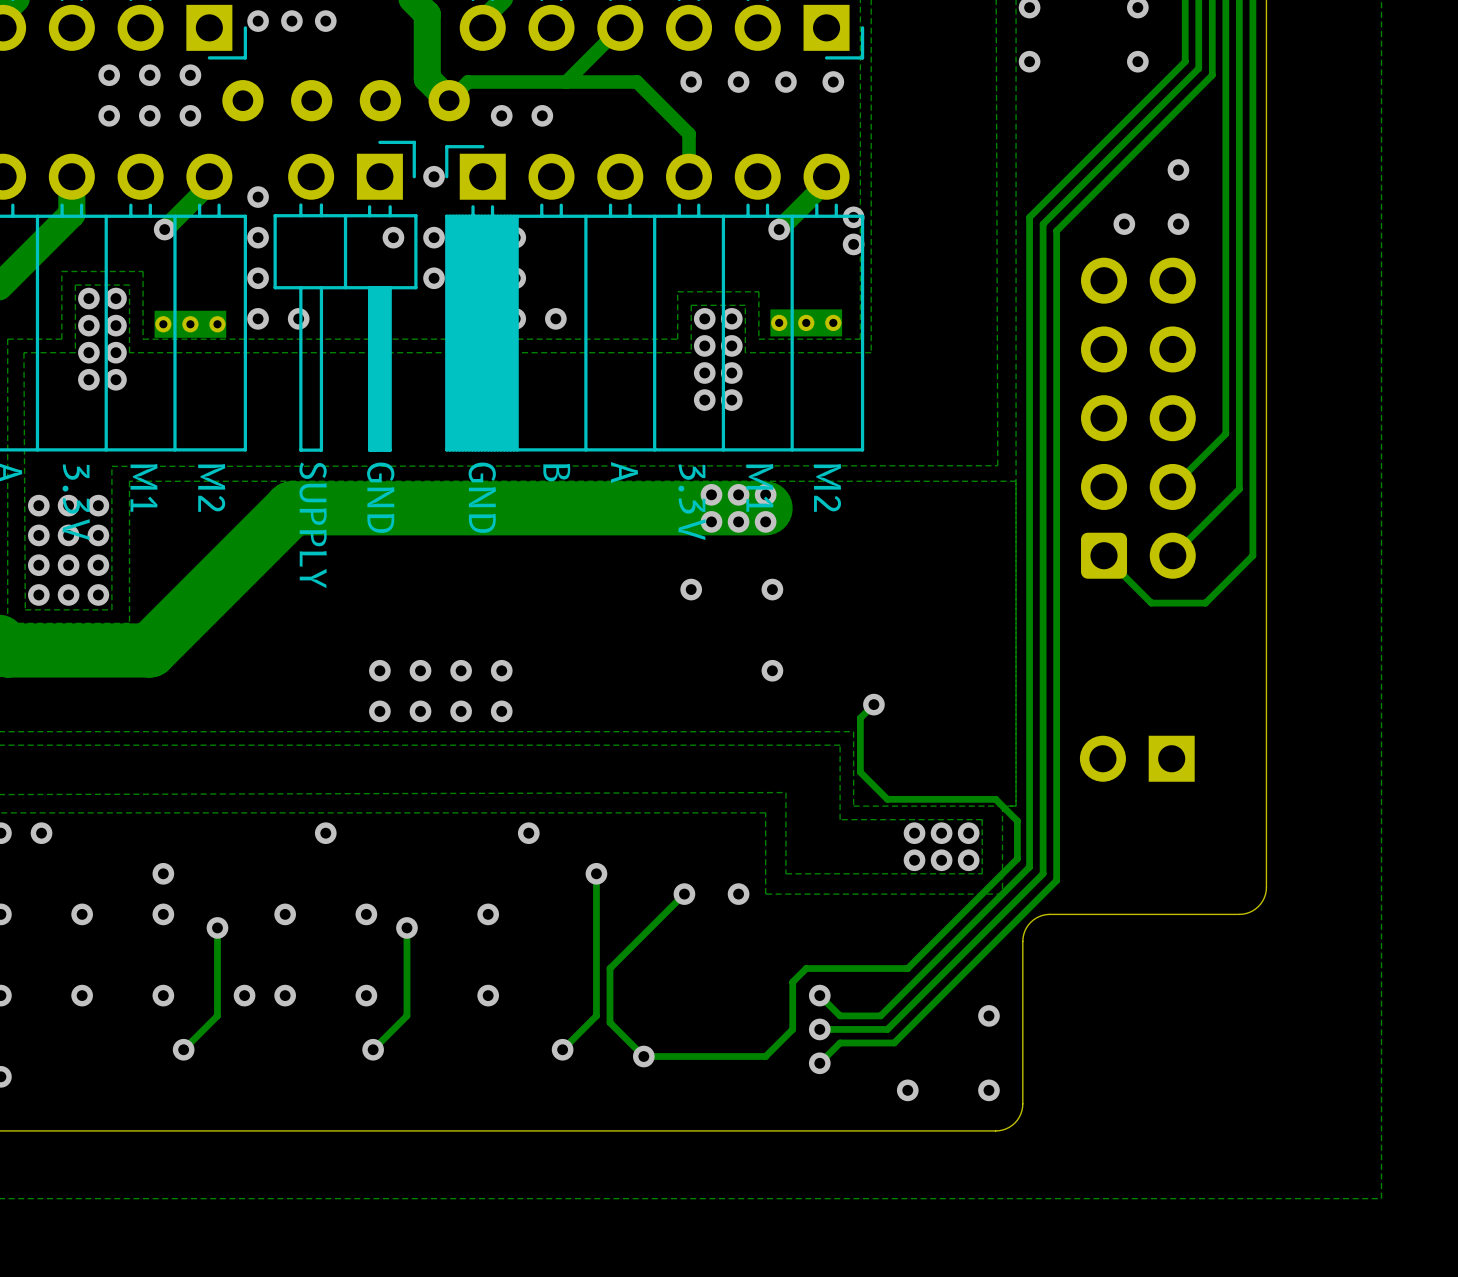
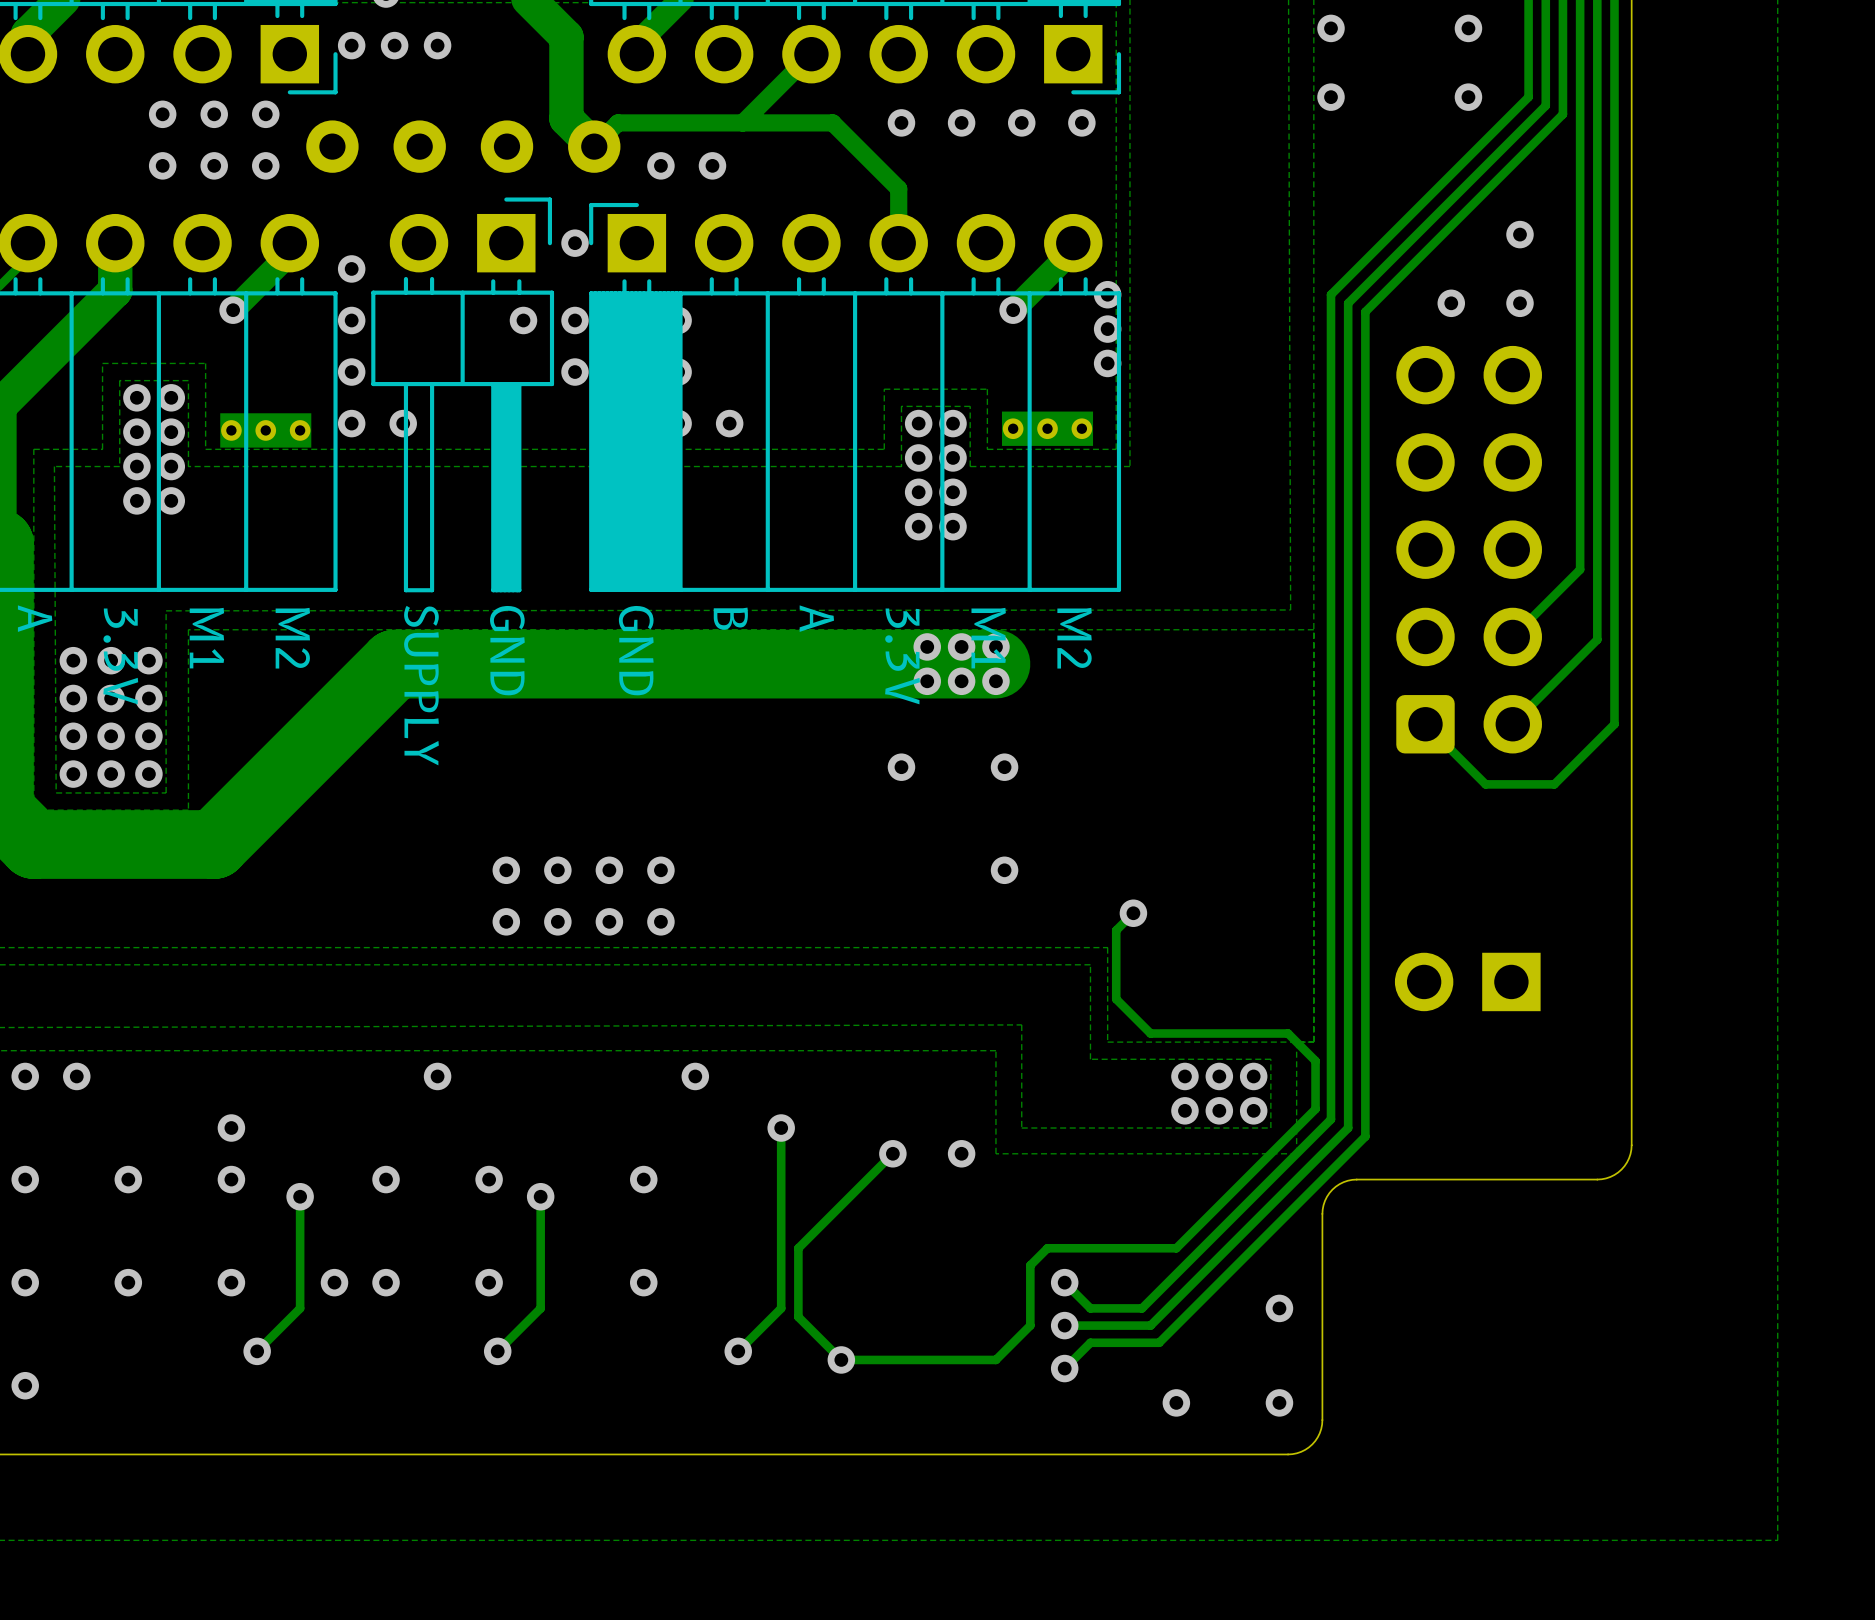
via: none -> (1107, 363)

